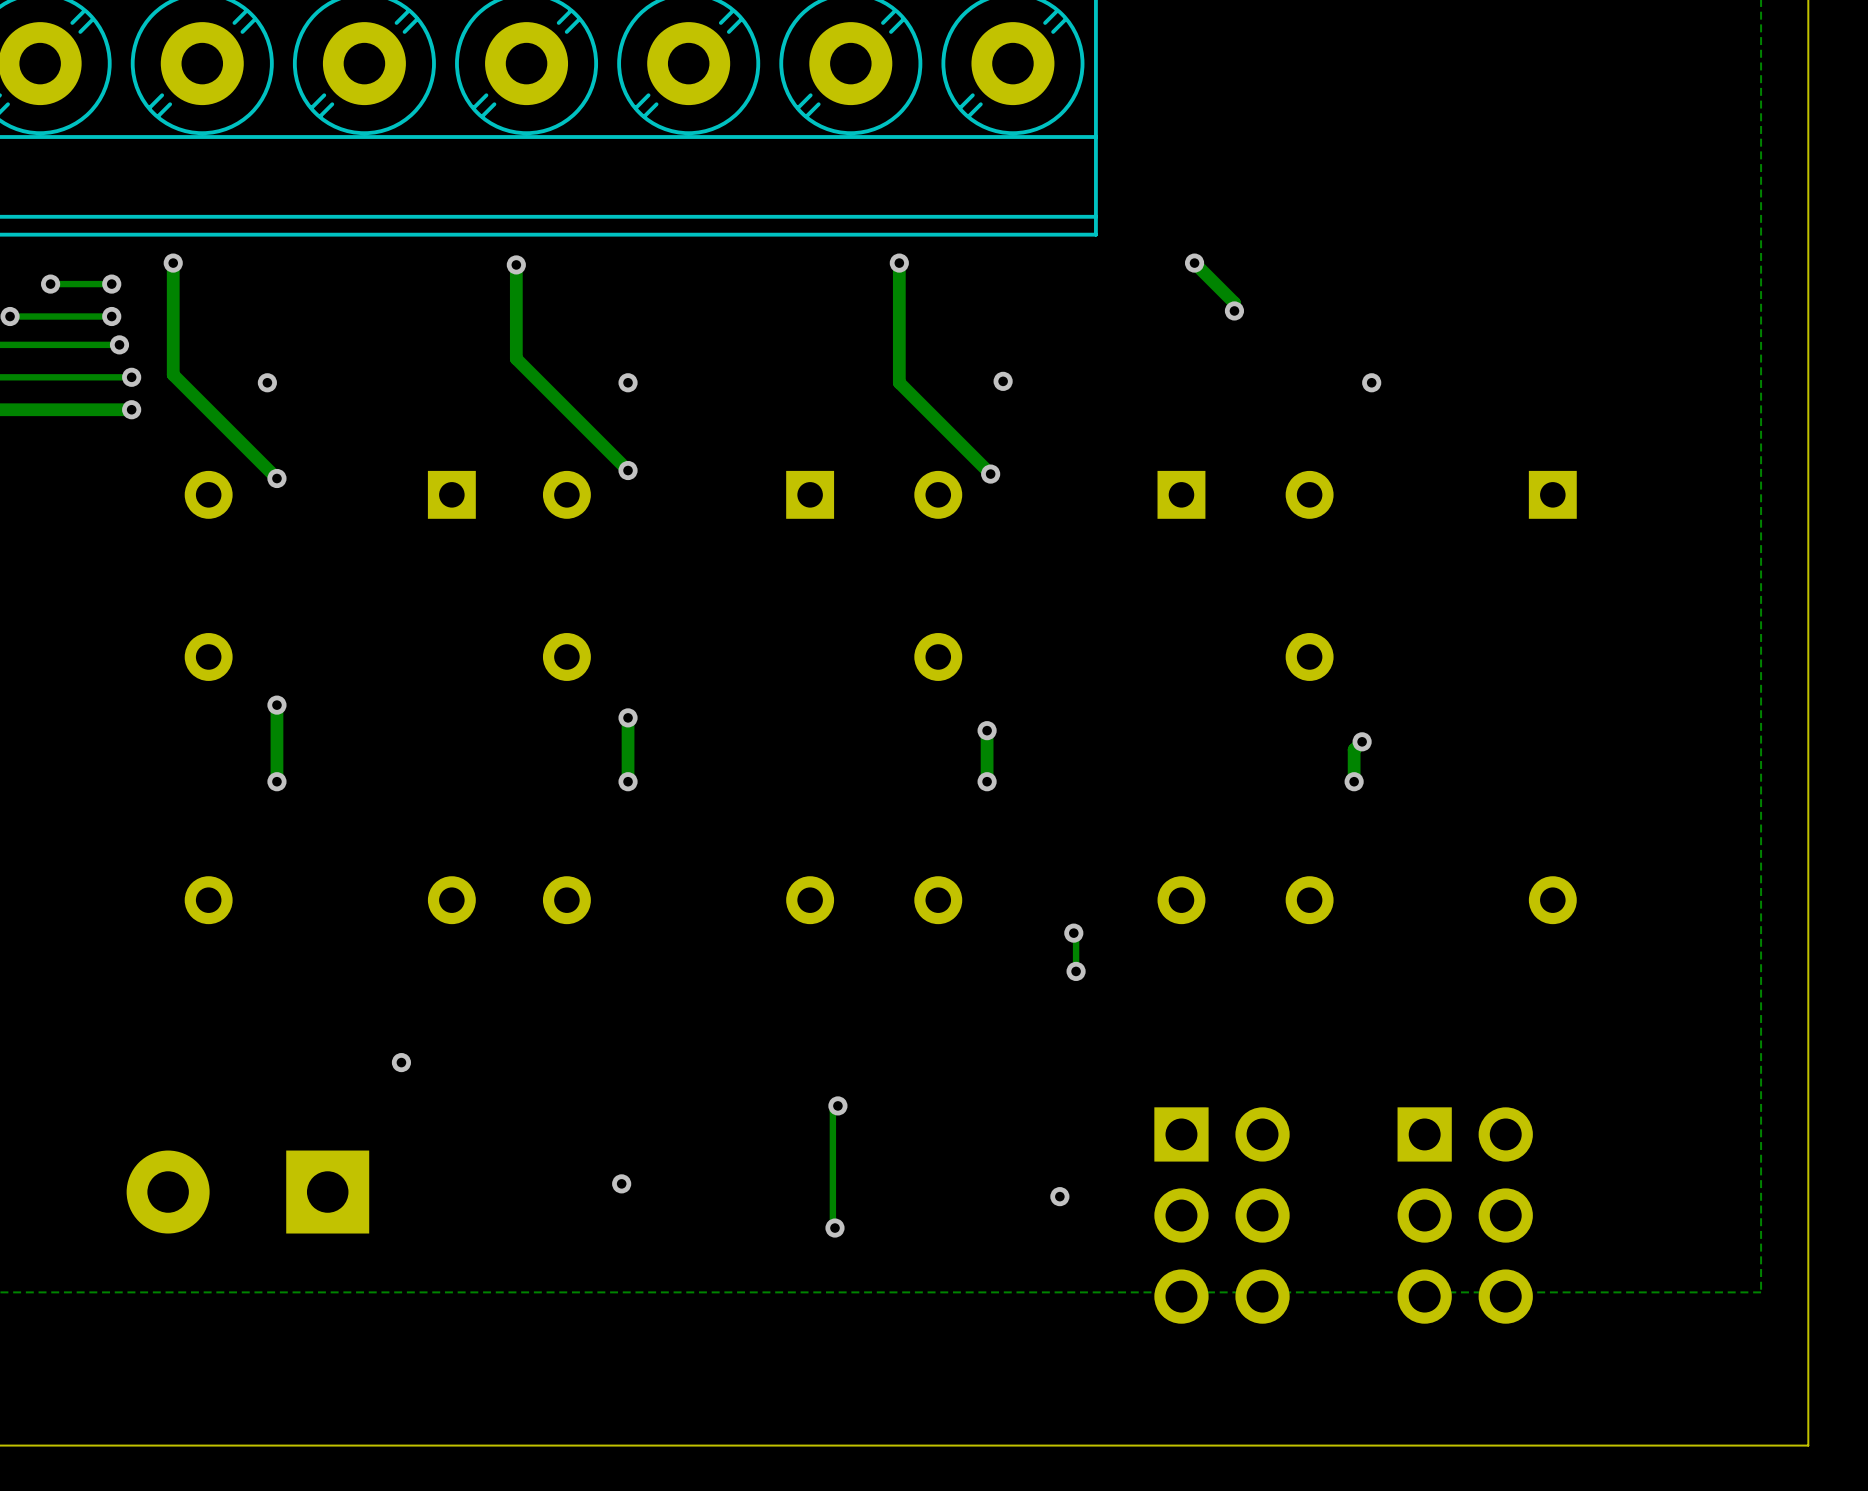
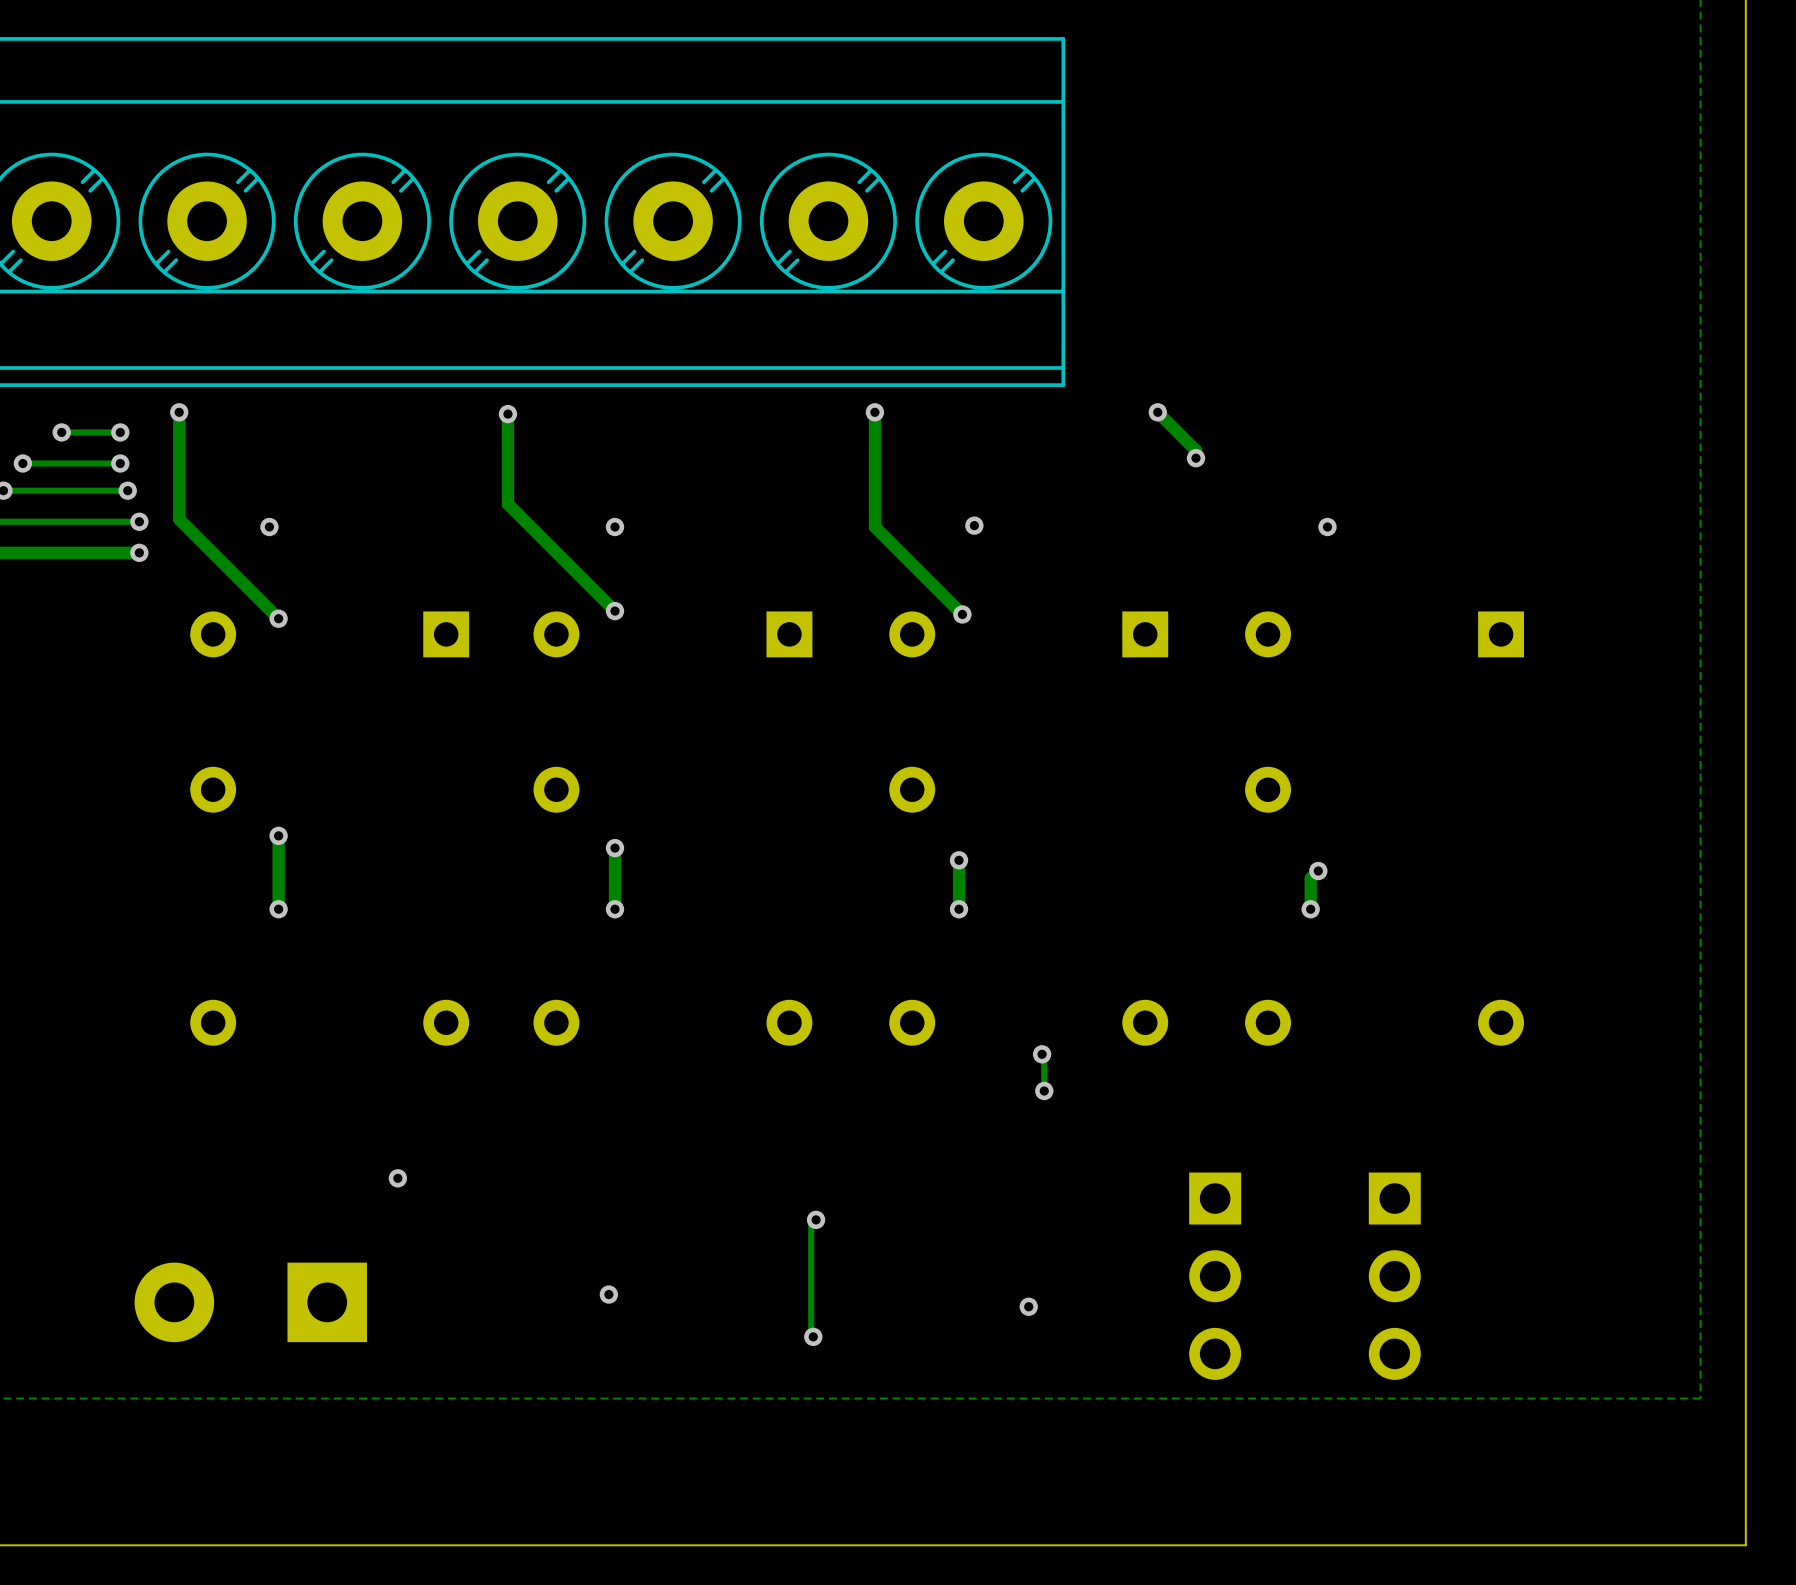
part: none -> (1215, 1276)
part: none -> (1394, 1276)
part: (1222, 1215) -> none
part: (1465, 1215) -> none

